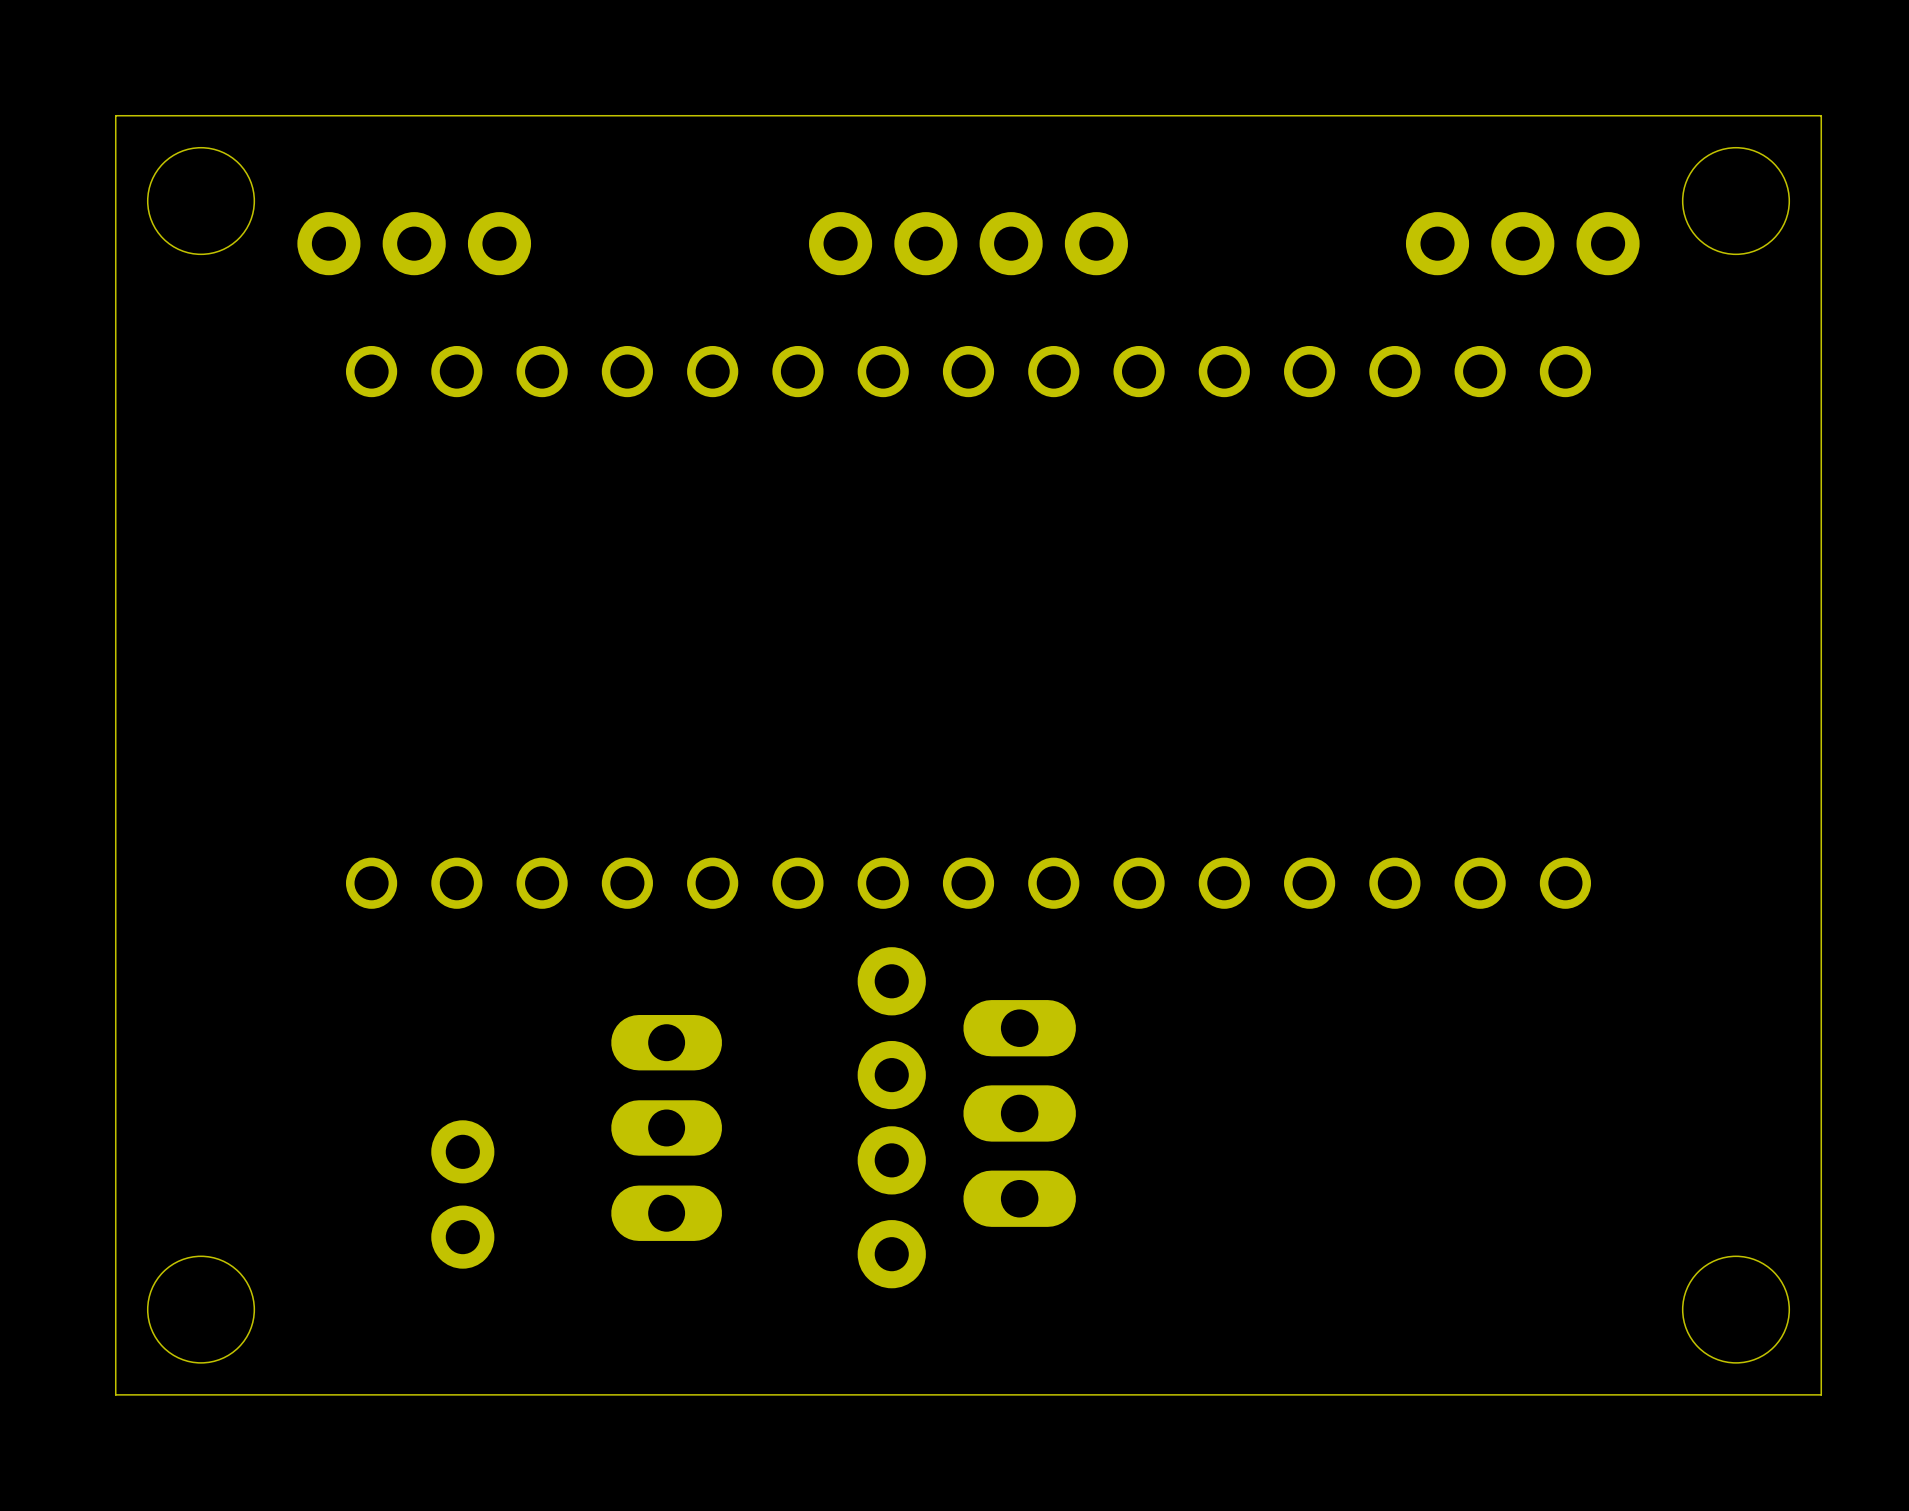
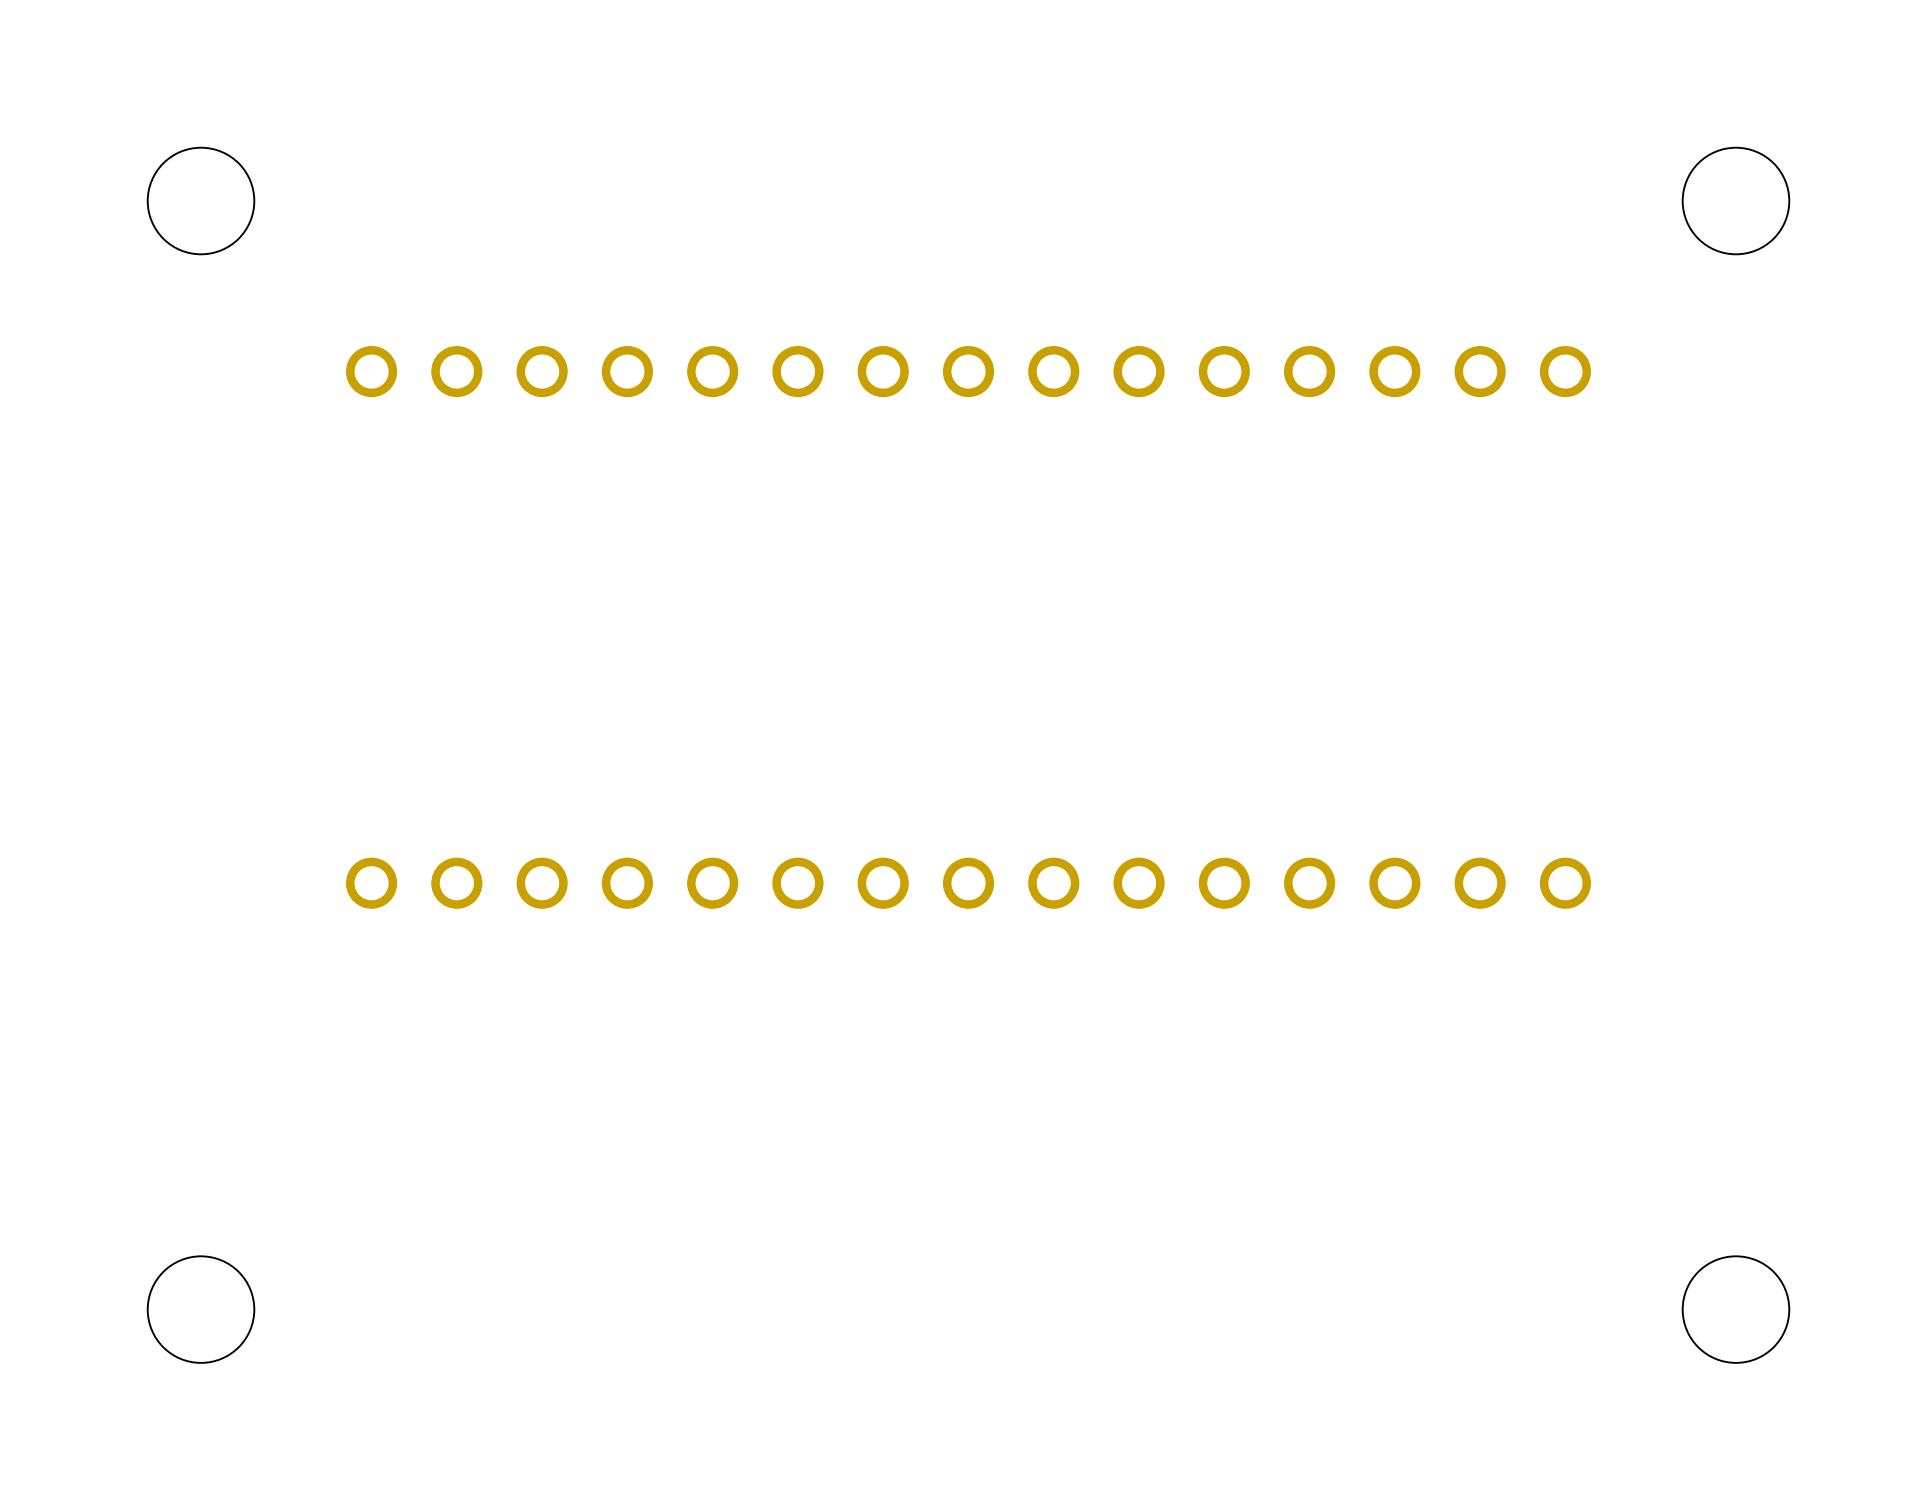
board edge: (1821, 115) (115, 115) (115, 1394) (1821, 1394) (1821, 115) -> none
part: (414, 243) -> none
part: (968, 243) -> none
part: (1522, 243) -> none
part: (891, 1028) -> none
part: (1019, 1113) -> none
part: (666, 1127) -> none
part: (462, 1194) -> none
part: (891, 1207) -> none

